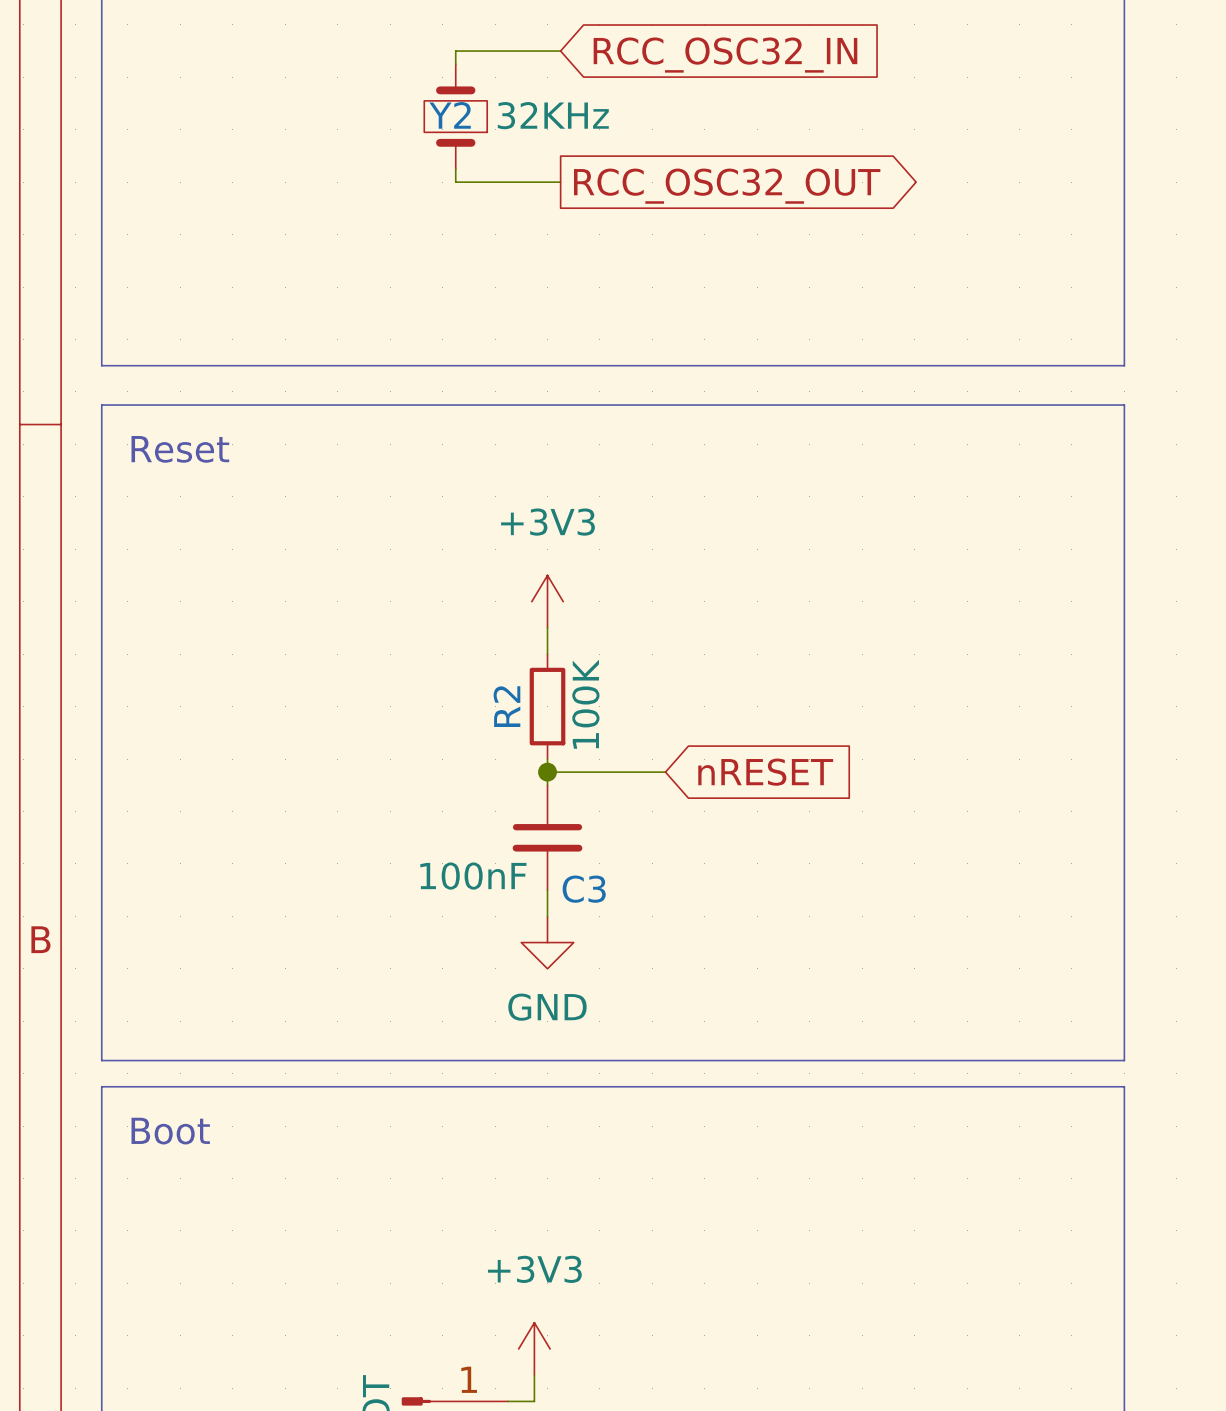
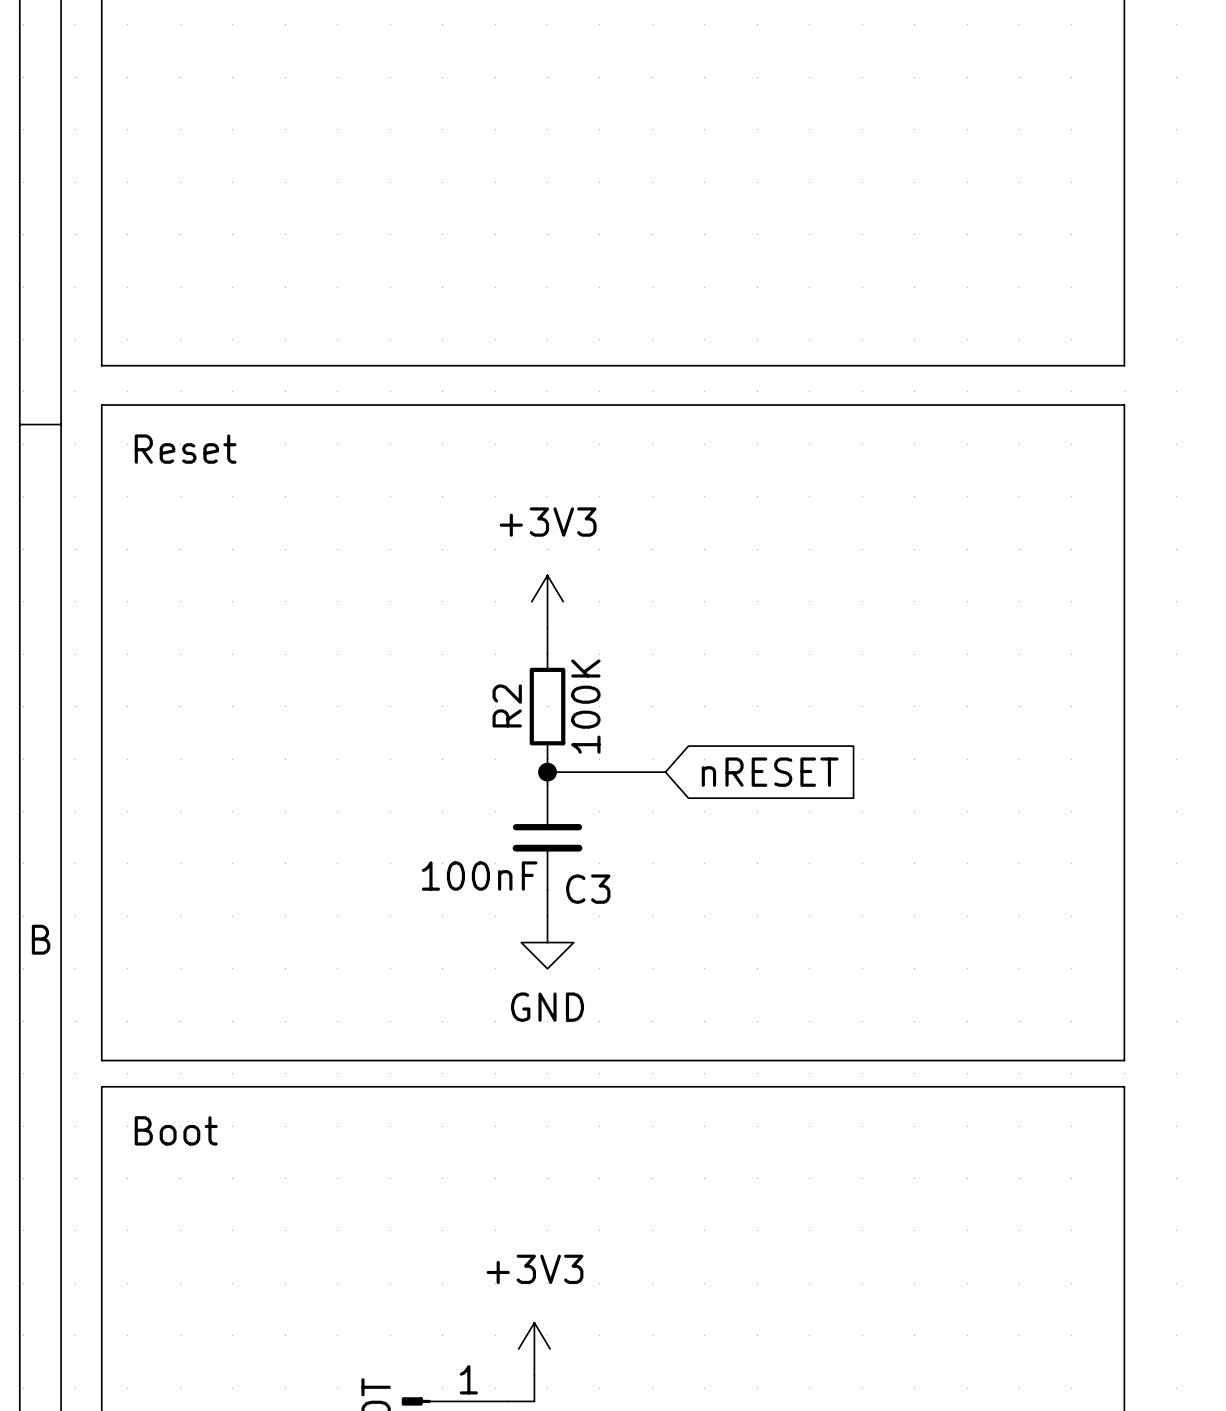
wire: (560, 51) (455, 51) (455, 64) -> none
global label: RCC_OSC32_IN (725, 55) -> none
Y2: 32KHz (455, 116) -> none
wire: (455, 169) (455, 182) (560, 182) -> none
global label: RCC_OSC32_OUT (727, 186) -> none

